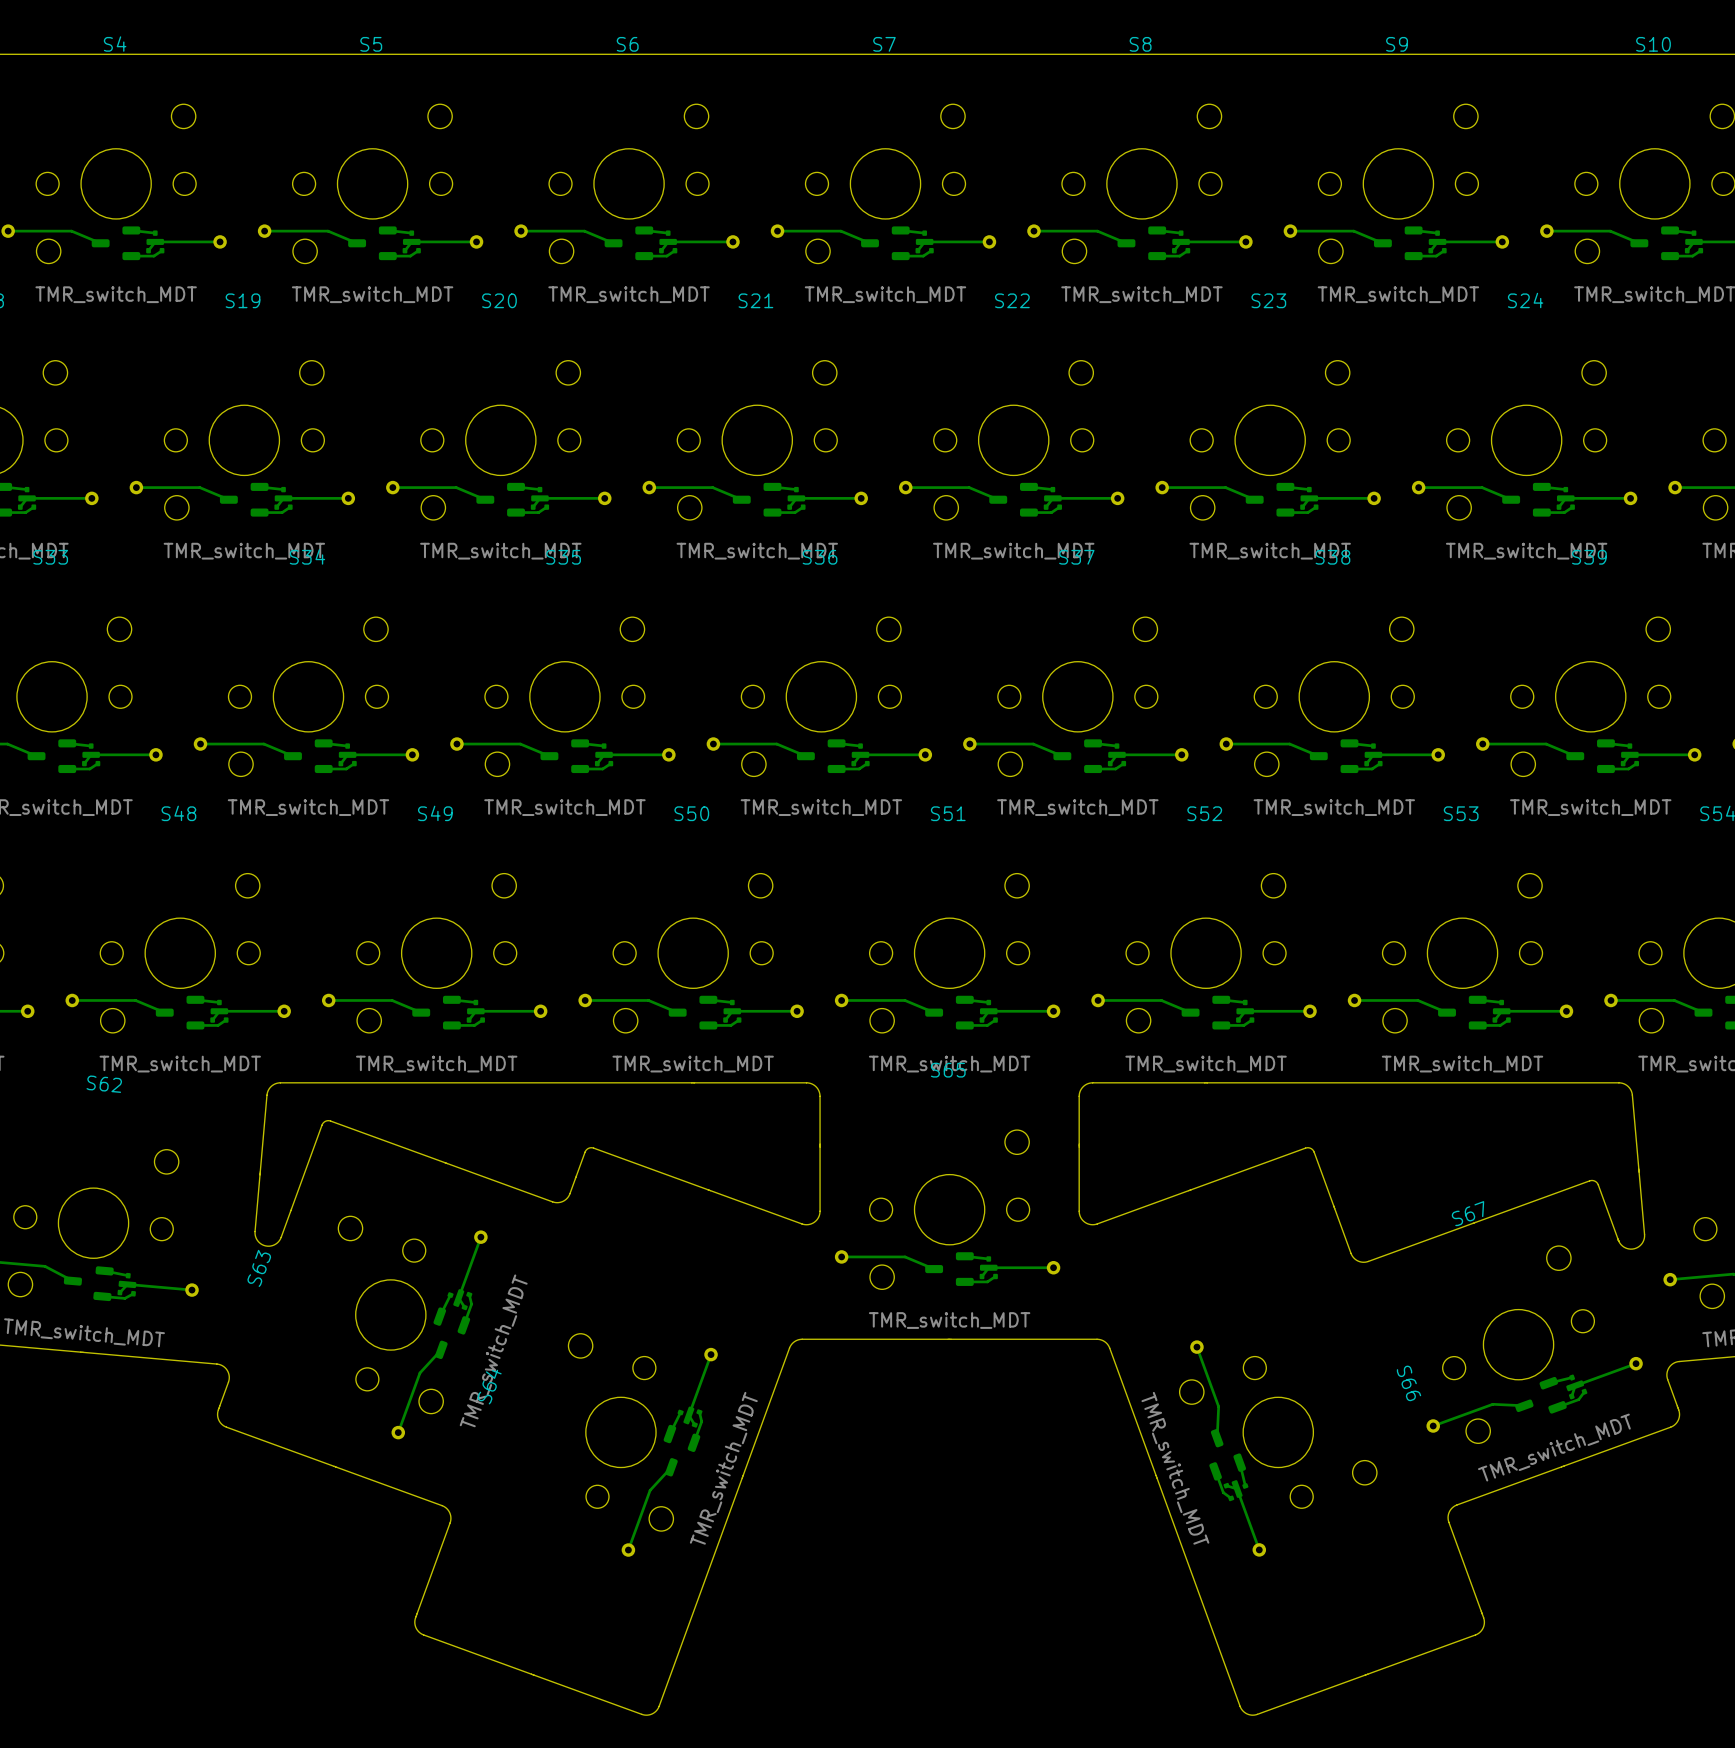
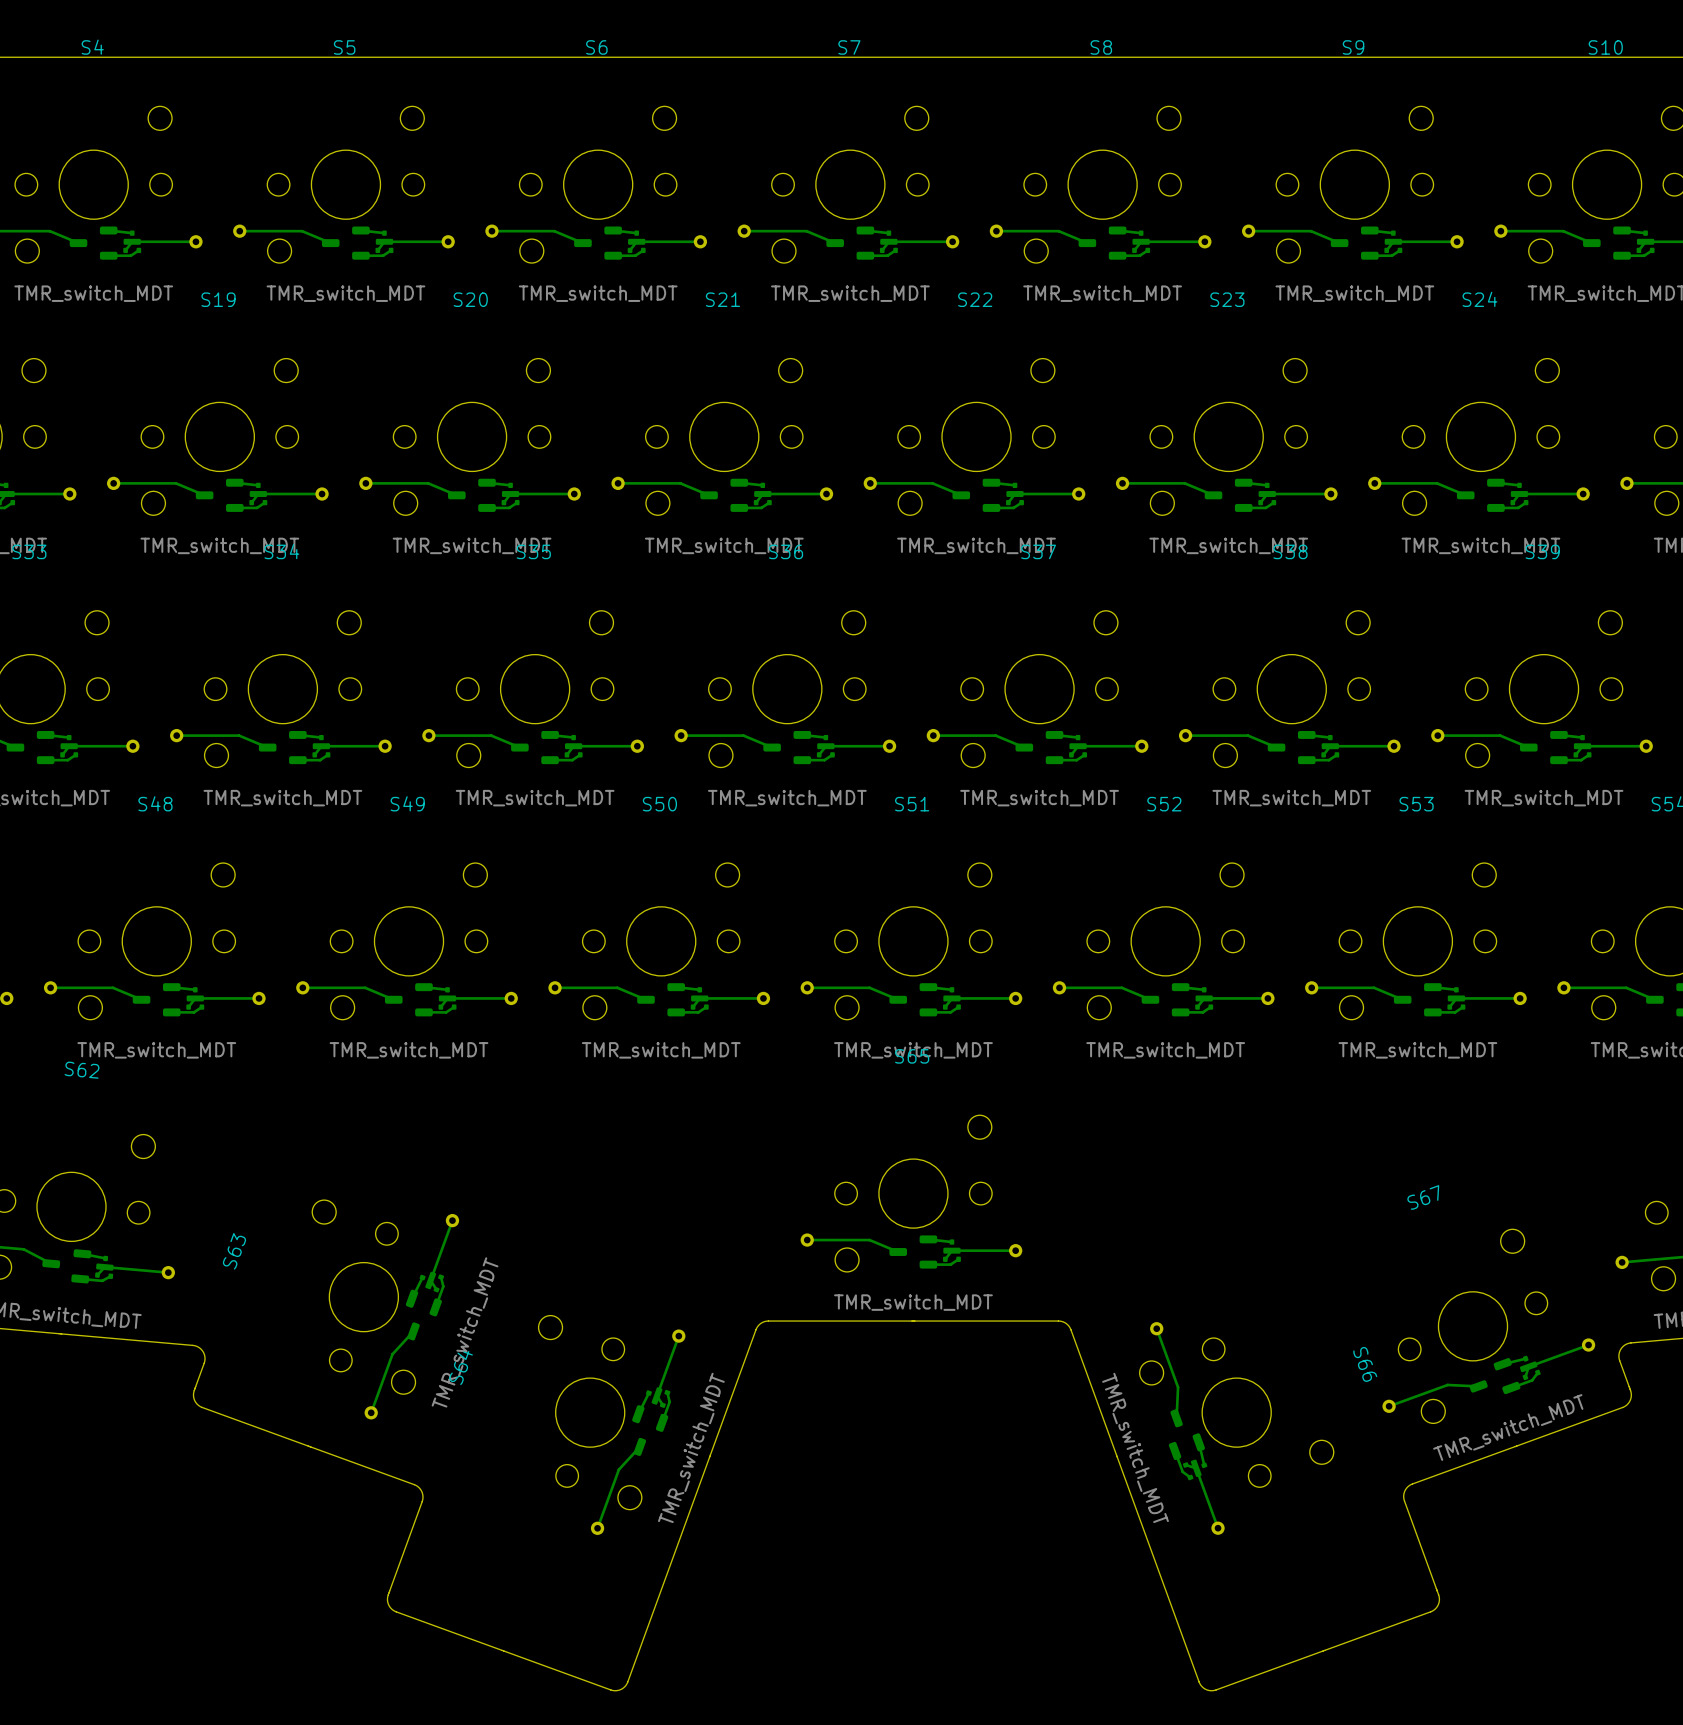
board edge: (280, 1082) (809, 1083) (816, 1086) (819, 1094) (819, 1214) (812, 1223) (803, 1224) (591, 1147) (585, 1151) (568, 1196) (562, 1201) (554, 1202) (327, 1120) (322, 1125) (280, 1238) (274, 1244) (265, 1245) (258, 1241) (255, 1233) (266, 1095) (271, 1086) (280, 1082) -> none
board edge: (1618, 1240) (1625, 1247) (1634, 1248) (1641, 1244) (1644, 1236) (1632, 1095) (1629, 1087) (1622, 1083) (1092, 1082) (1084, 1085) (1079, 1093) (1079, 1212) (1082, 1220) (1089, 1224) (1097, 1223) (1308, 1147) (1314, 1152) (1351, 1254) (1359, 1261) (1368, 1261) (1591, 1180) (1597, 1184) (1618, 1241) -> none

